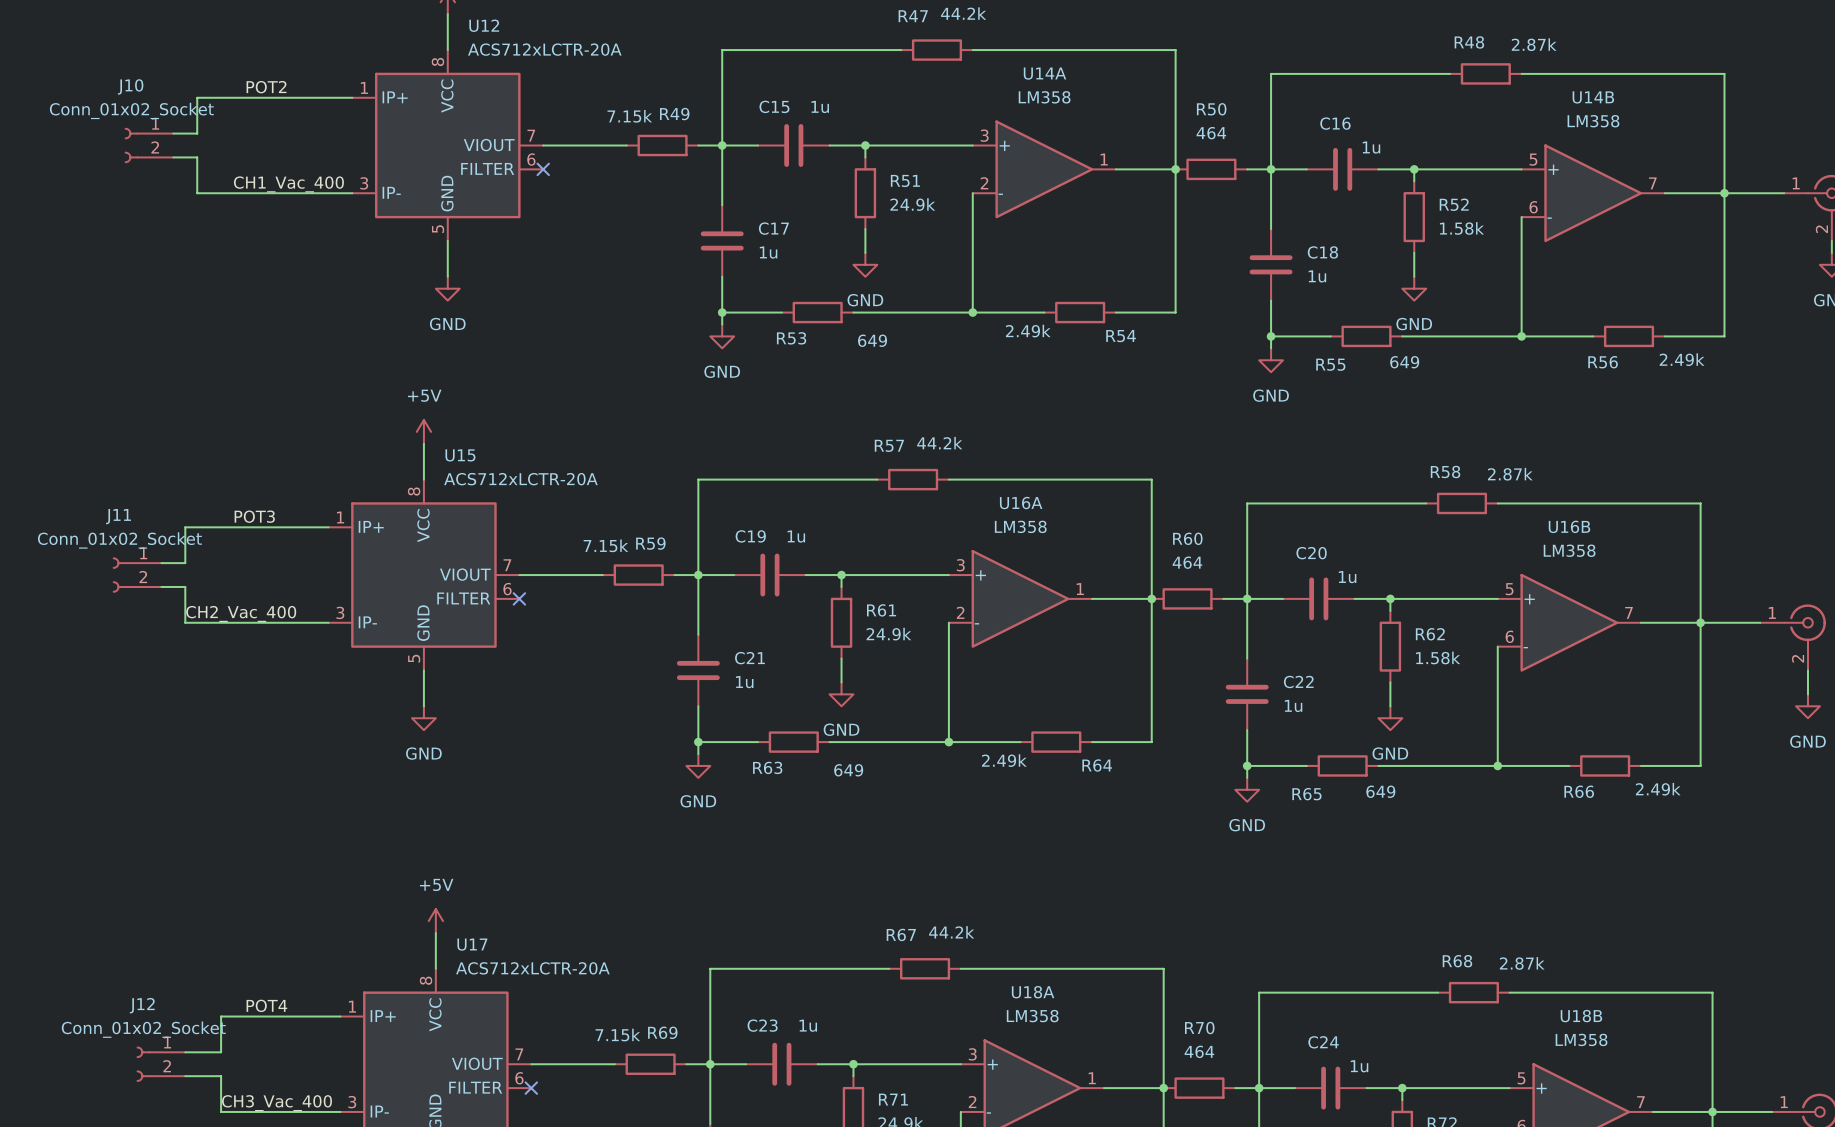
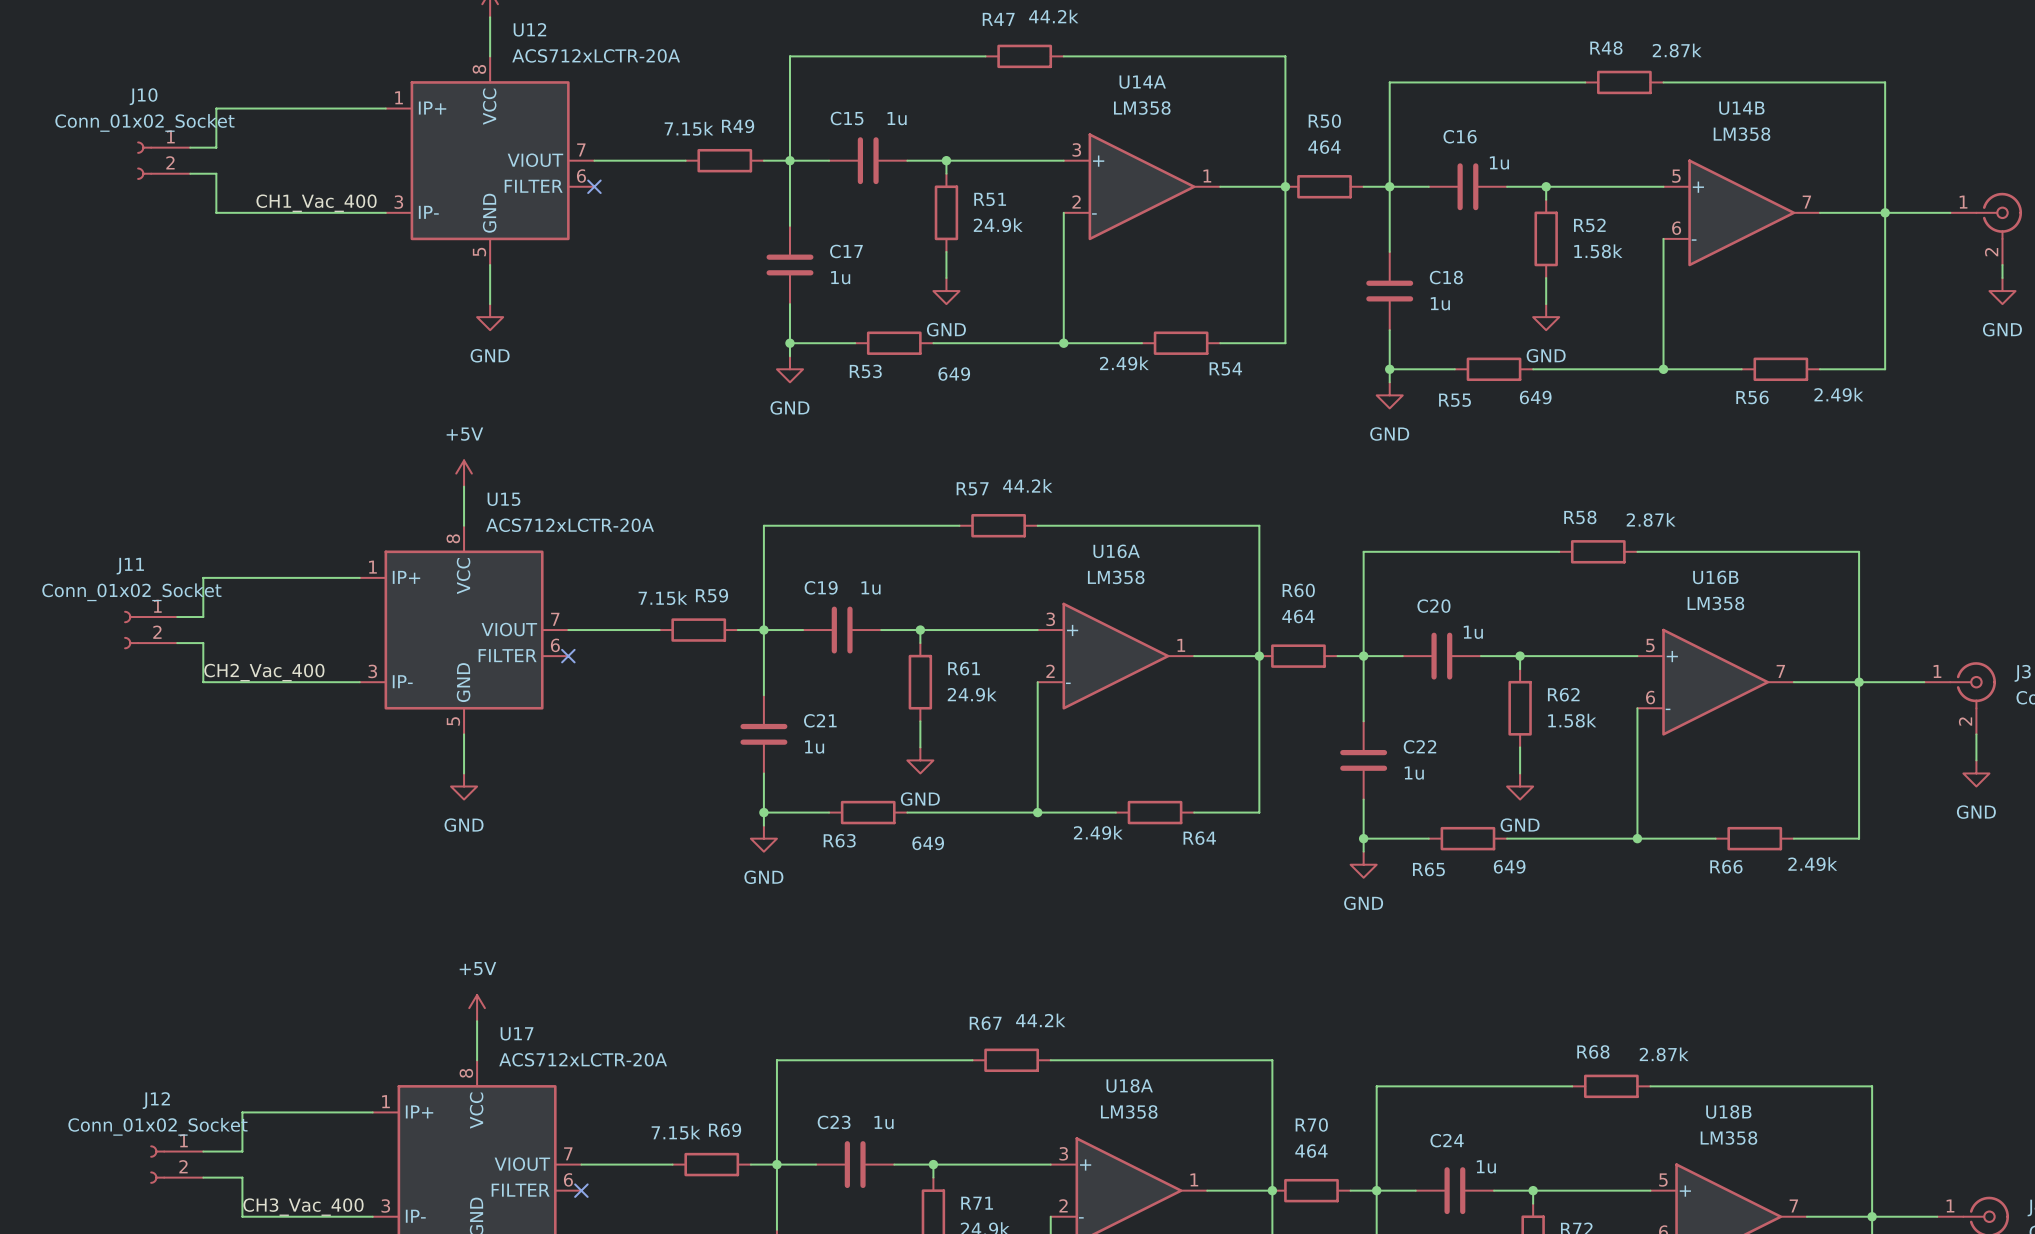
label: POT2 (266, 87) -> none
label: POT3 (254, 516) -> none
label: POT4 (266, 1005) -> none

